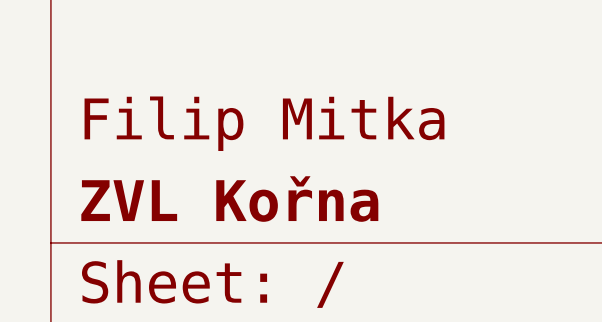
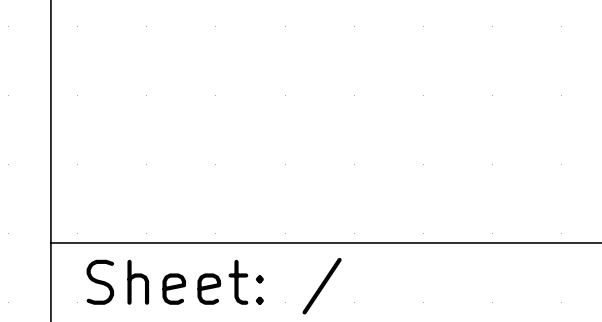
title block: Filip Mitka (264, 123) -> none
title block: ZVL Kořna (229, 199) -> none

